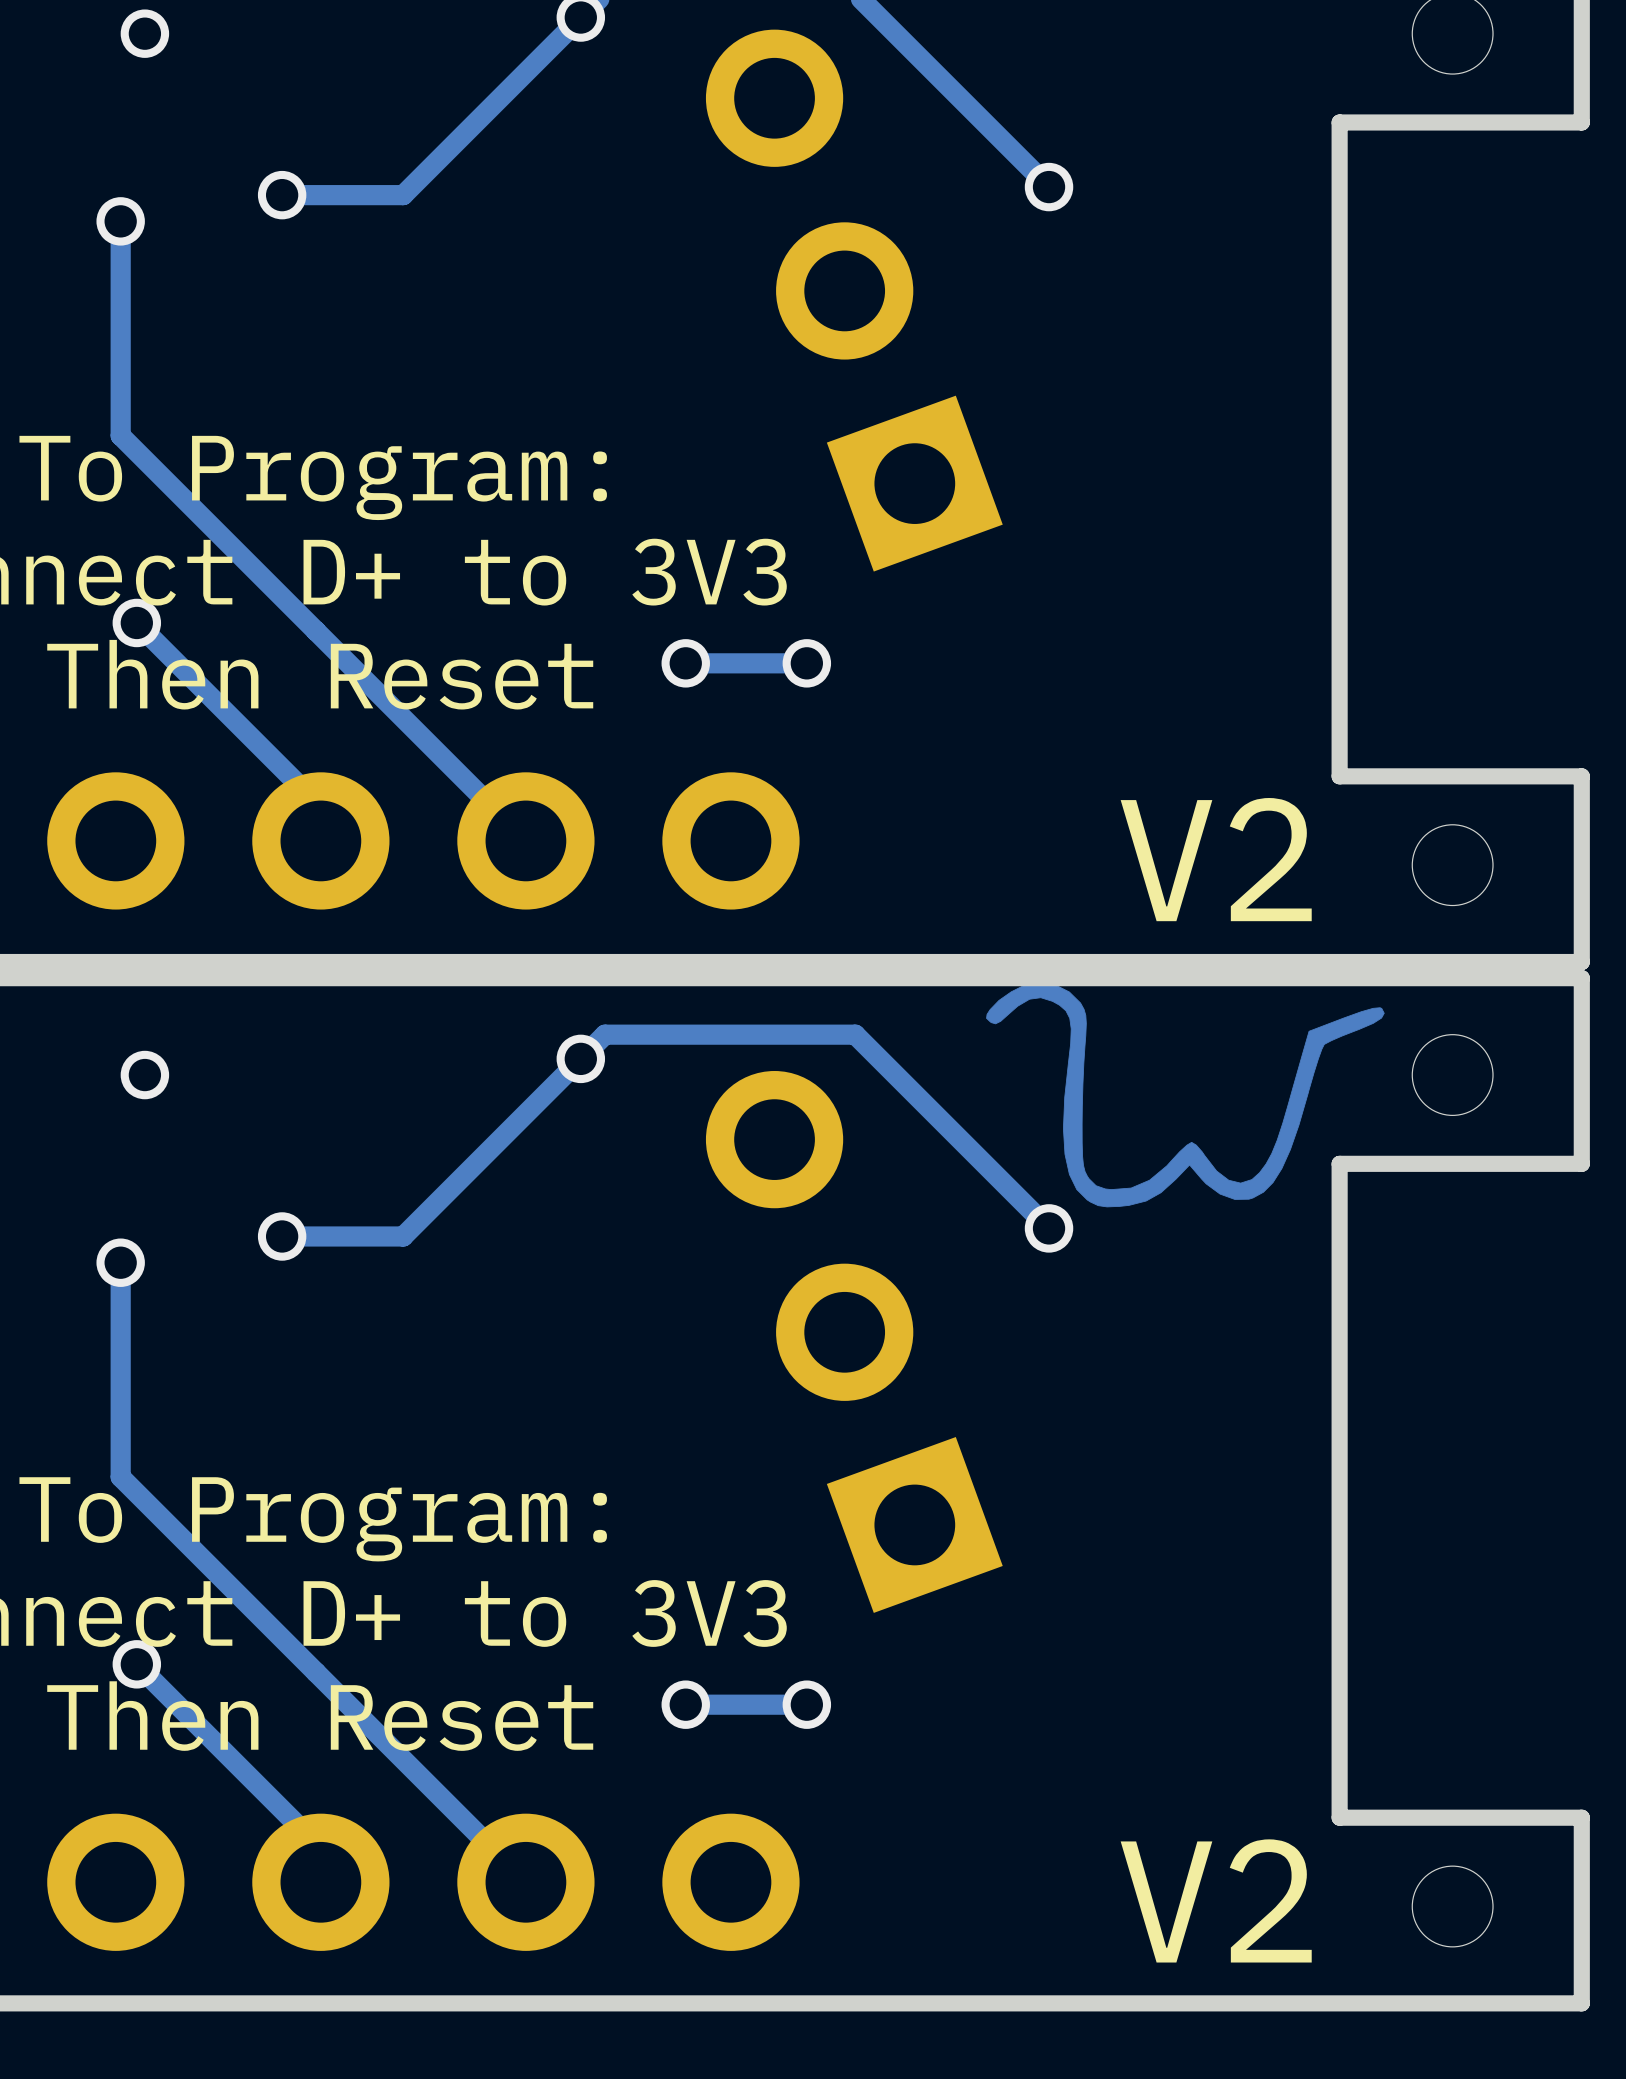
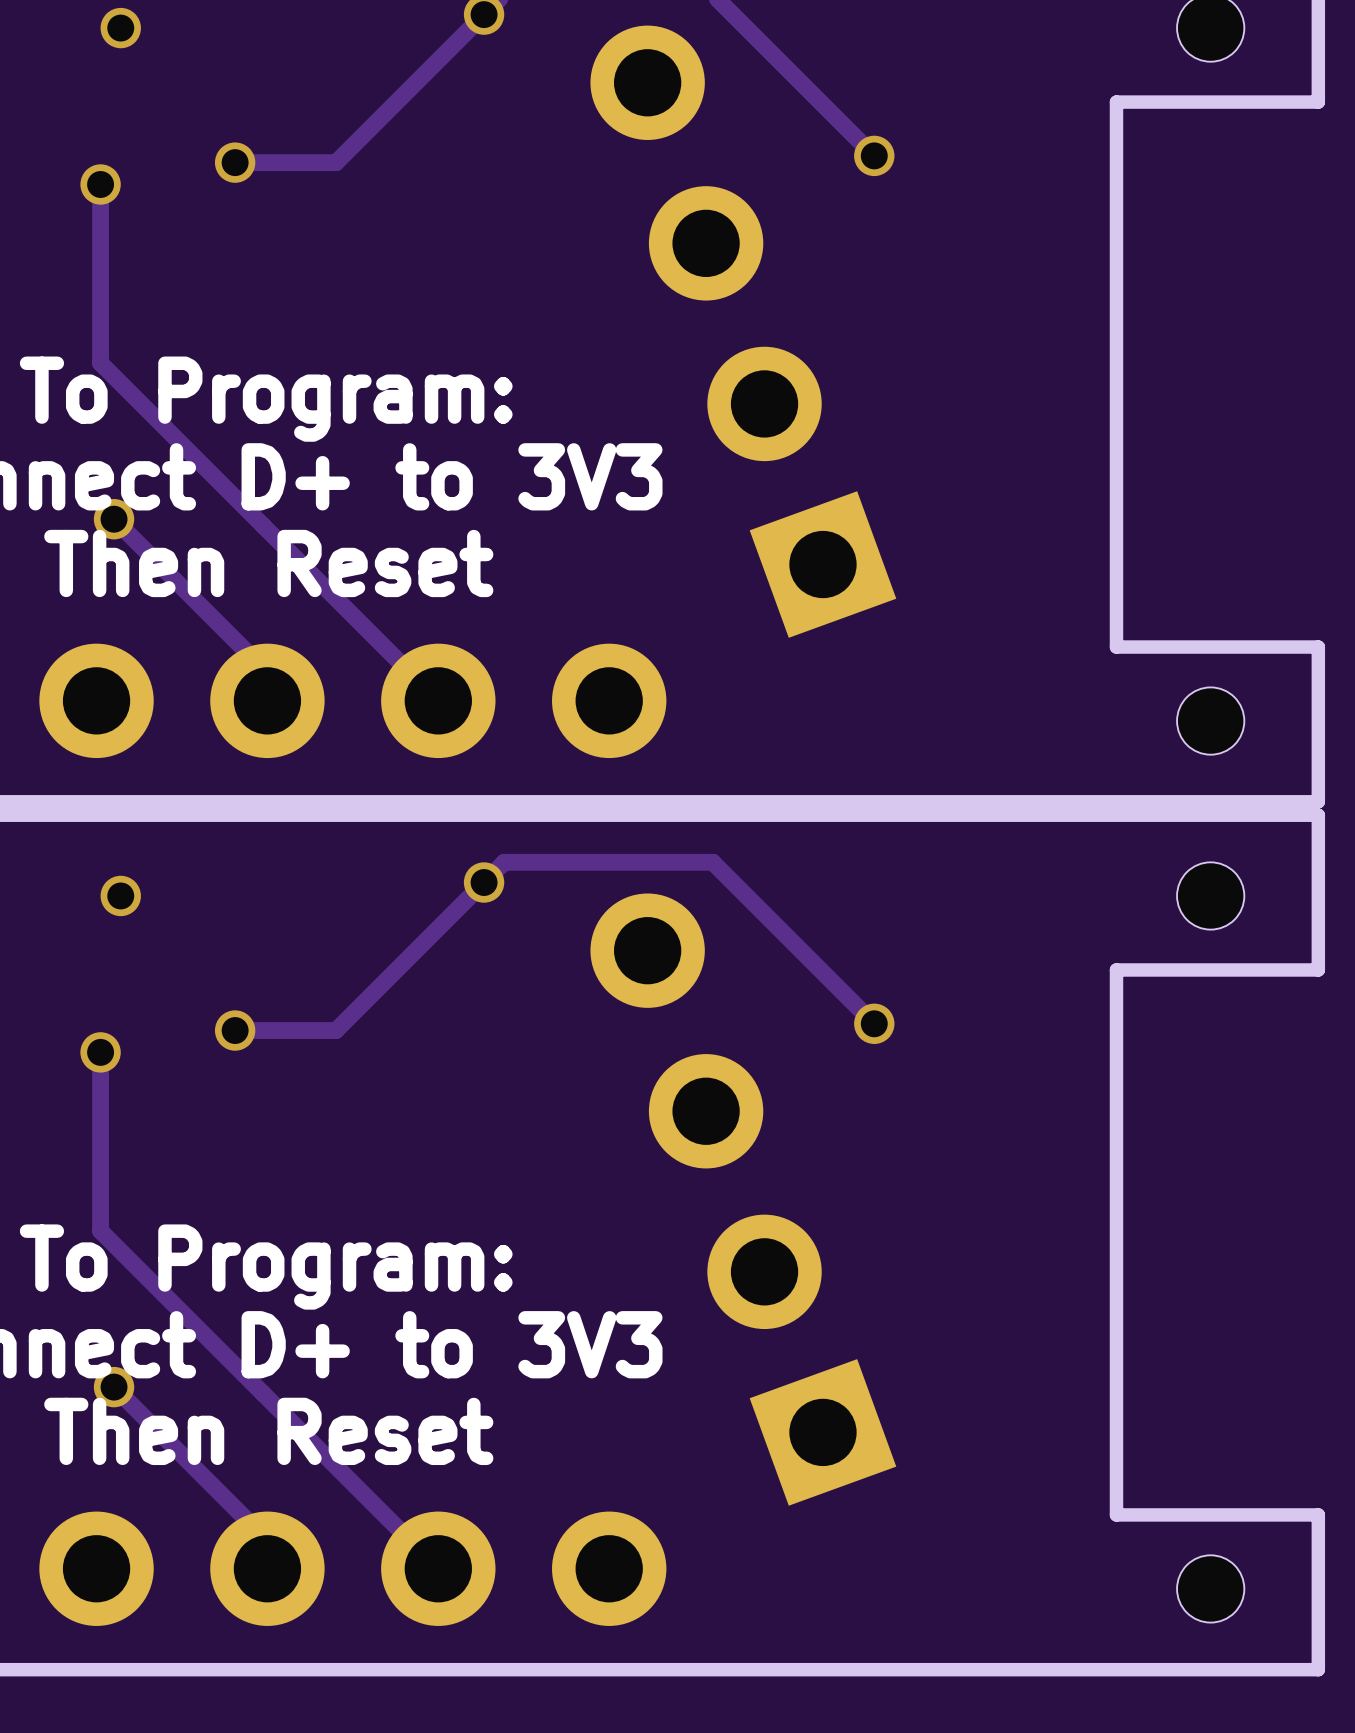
part: (854, 300) -> none
part: none -> (743, 331)
via: (685, 663) -> none
track: (806, 663) (685, 663) -> none
via: (806, 663) -> none
text: V2 (1216, 859) -> none
drawing: [986, 981, 1385, 1208] -> none
part: (854, 1341) -> none
part: none -> (743, 1199)
via: (685, 1704) -> none
track: (806, 1704) (685, 1704) -> none
via: (806, 1704) -> none
text: V2 (1216, 1900) -> none

